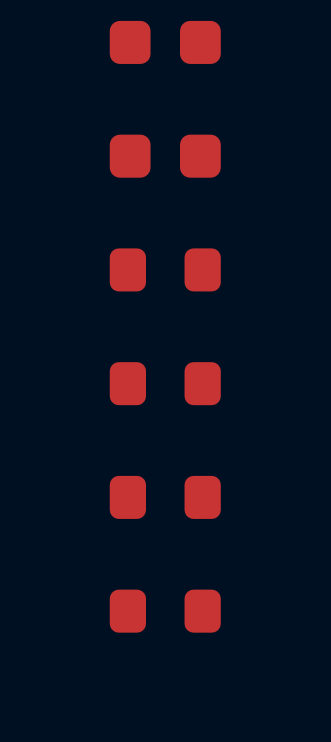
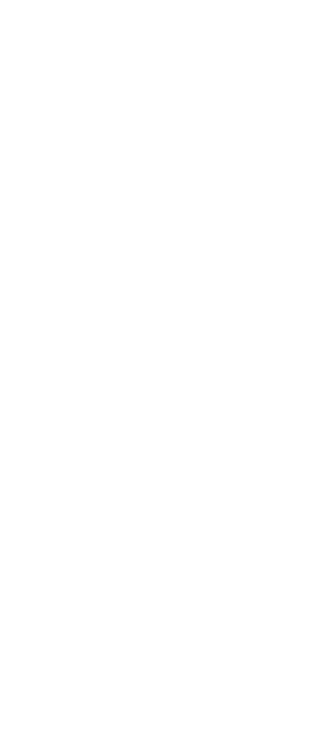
part: (165, 42) -> none
part: (165, 156) -> none
part: (165, 269) -> none
part: (165, 383) -> none
part: (165, 497) -> none
part: (165, 611) -> none

